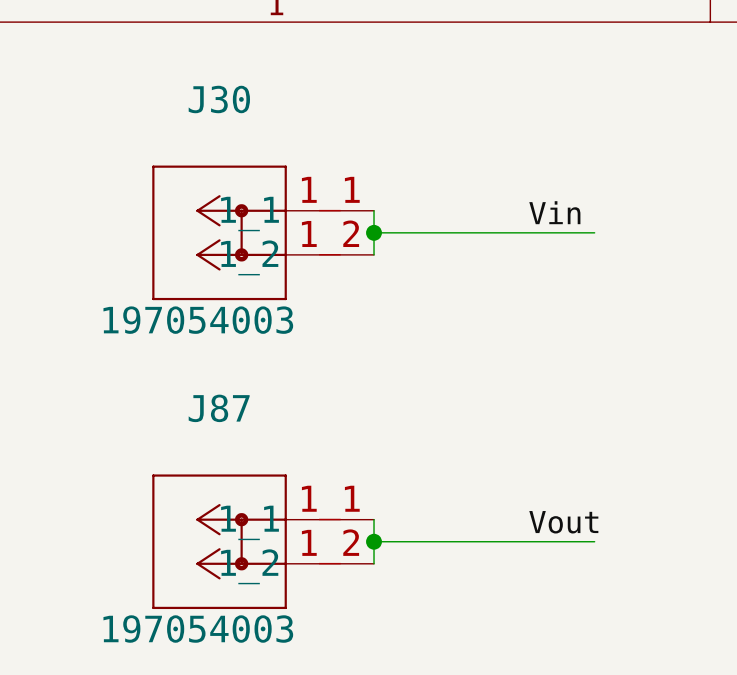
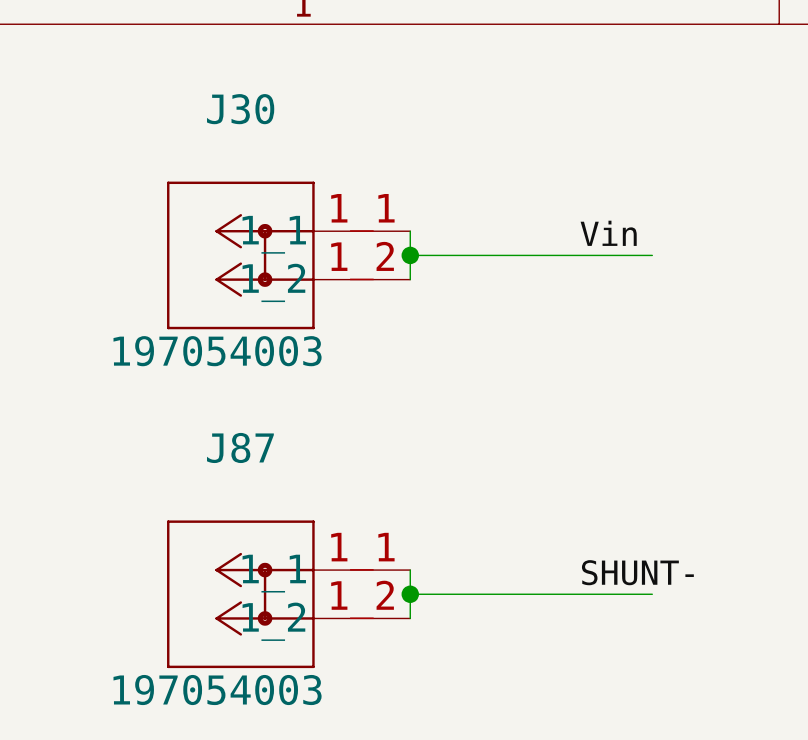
label: Vout (563, 522) -> SHUNT- (637, 572)

